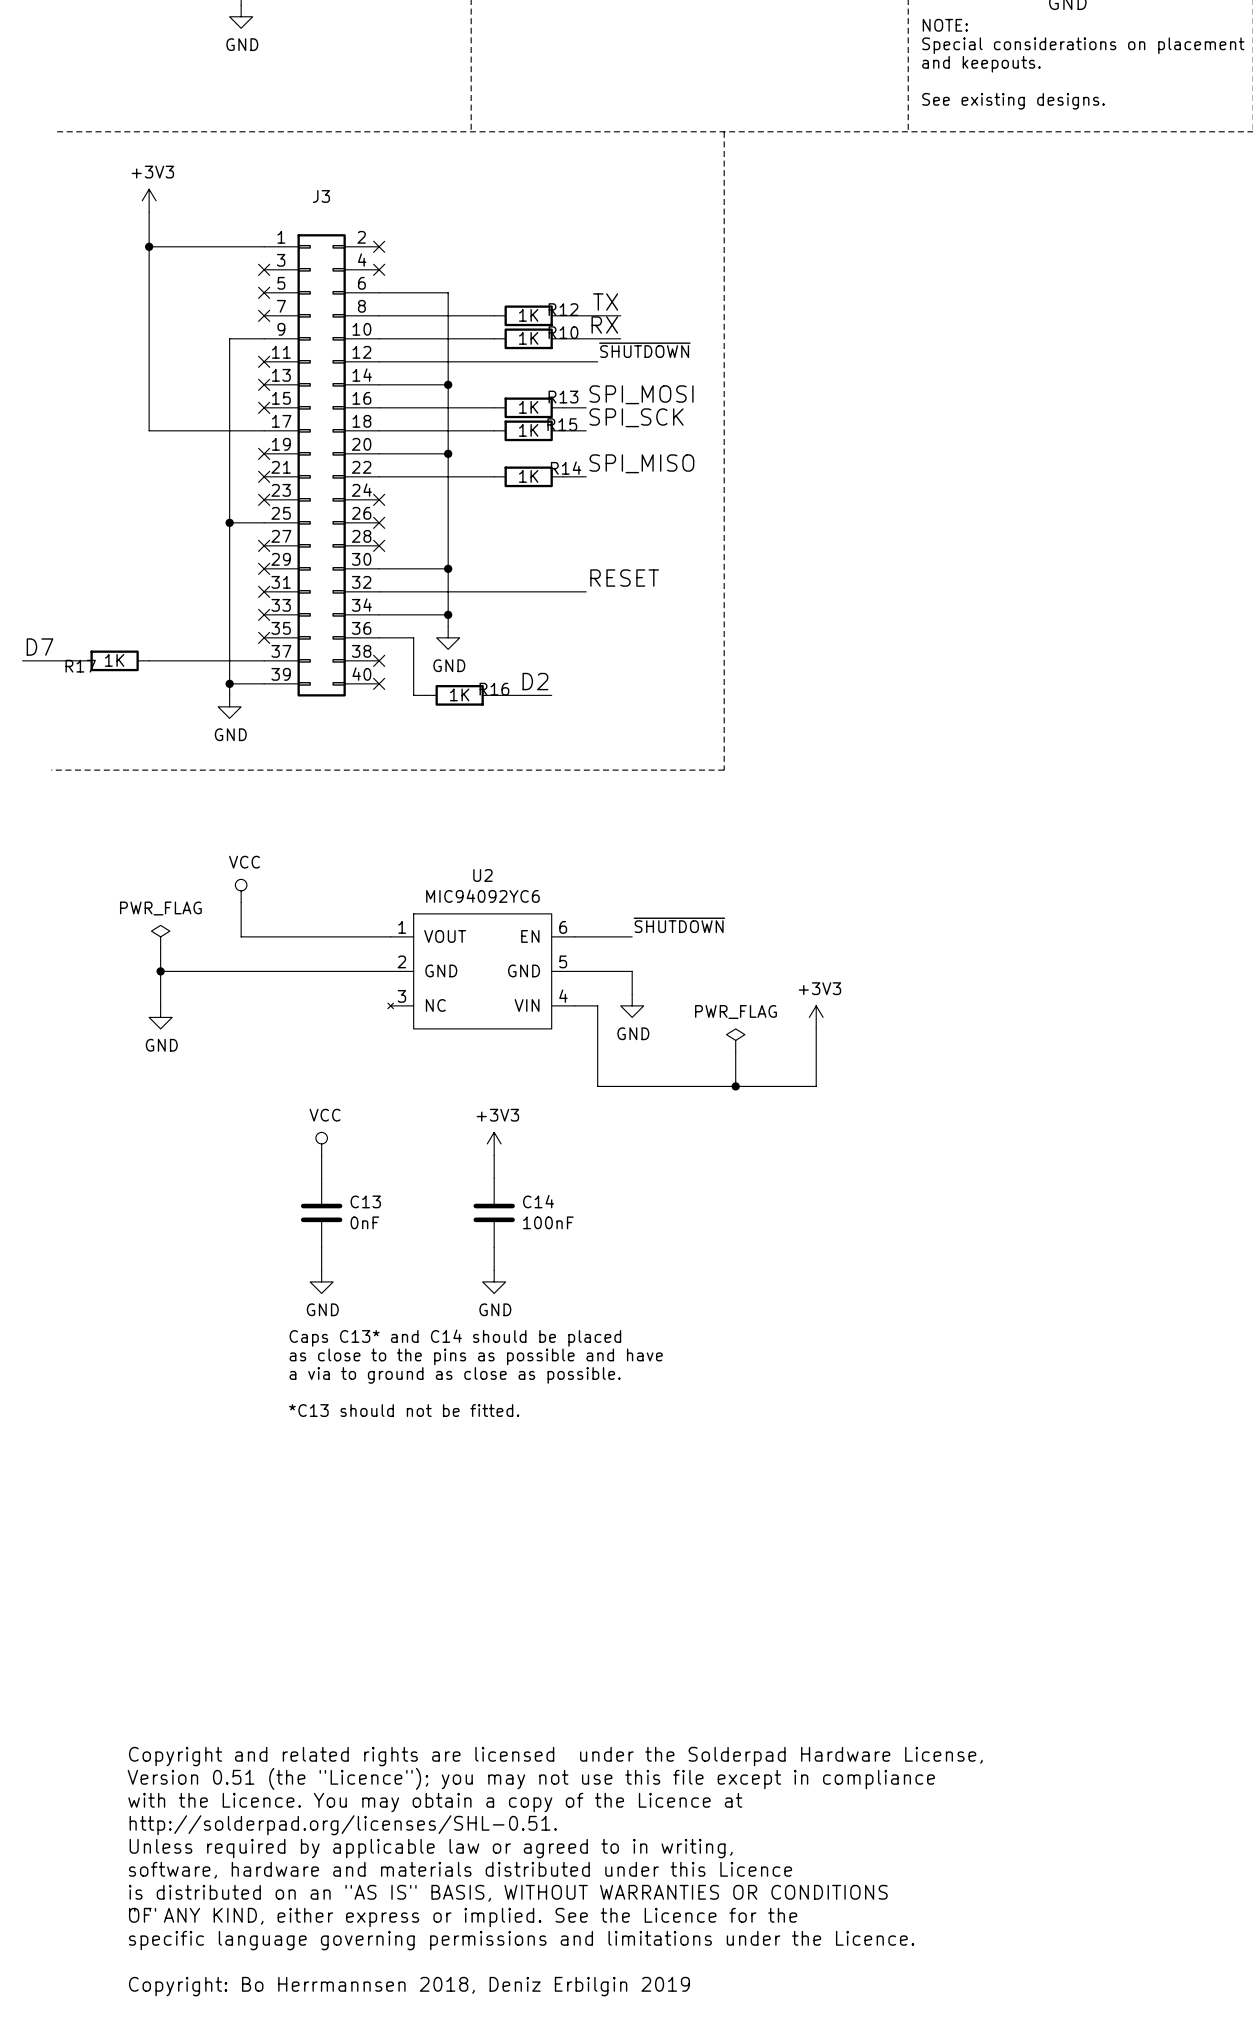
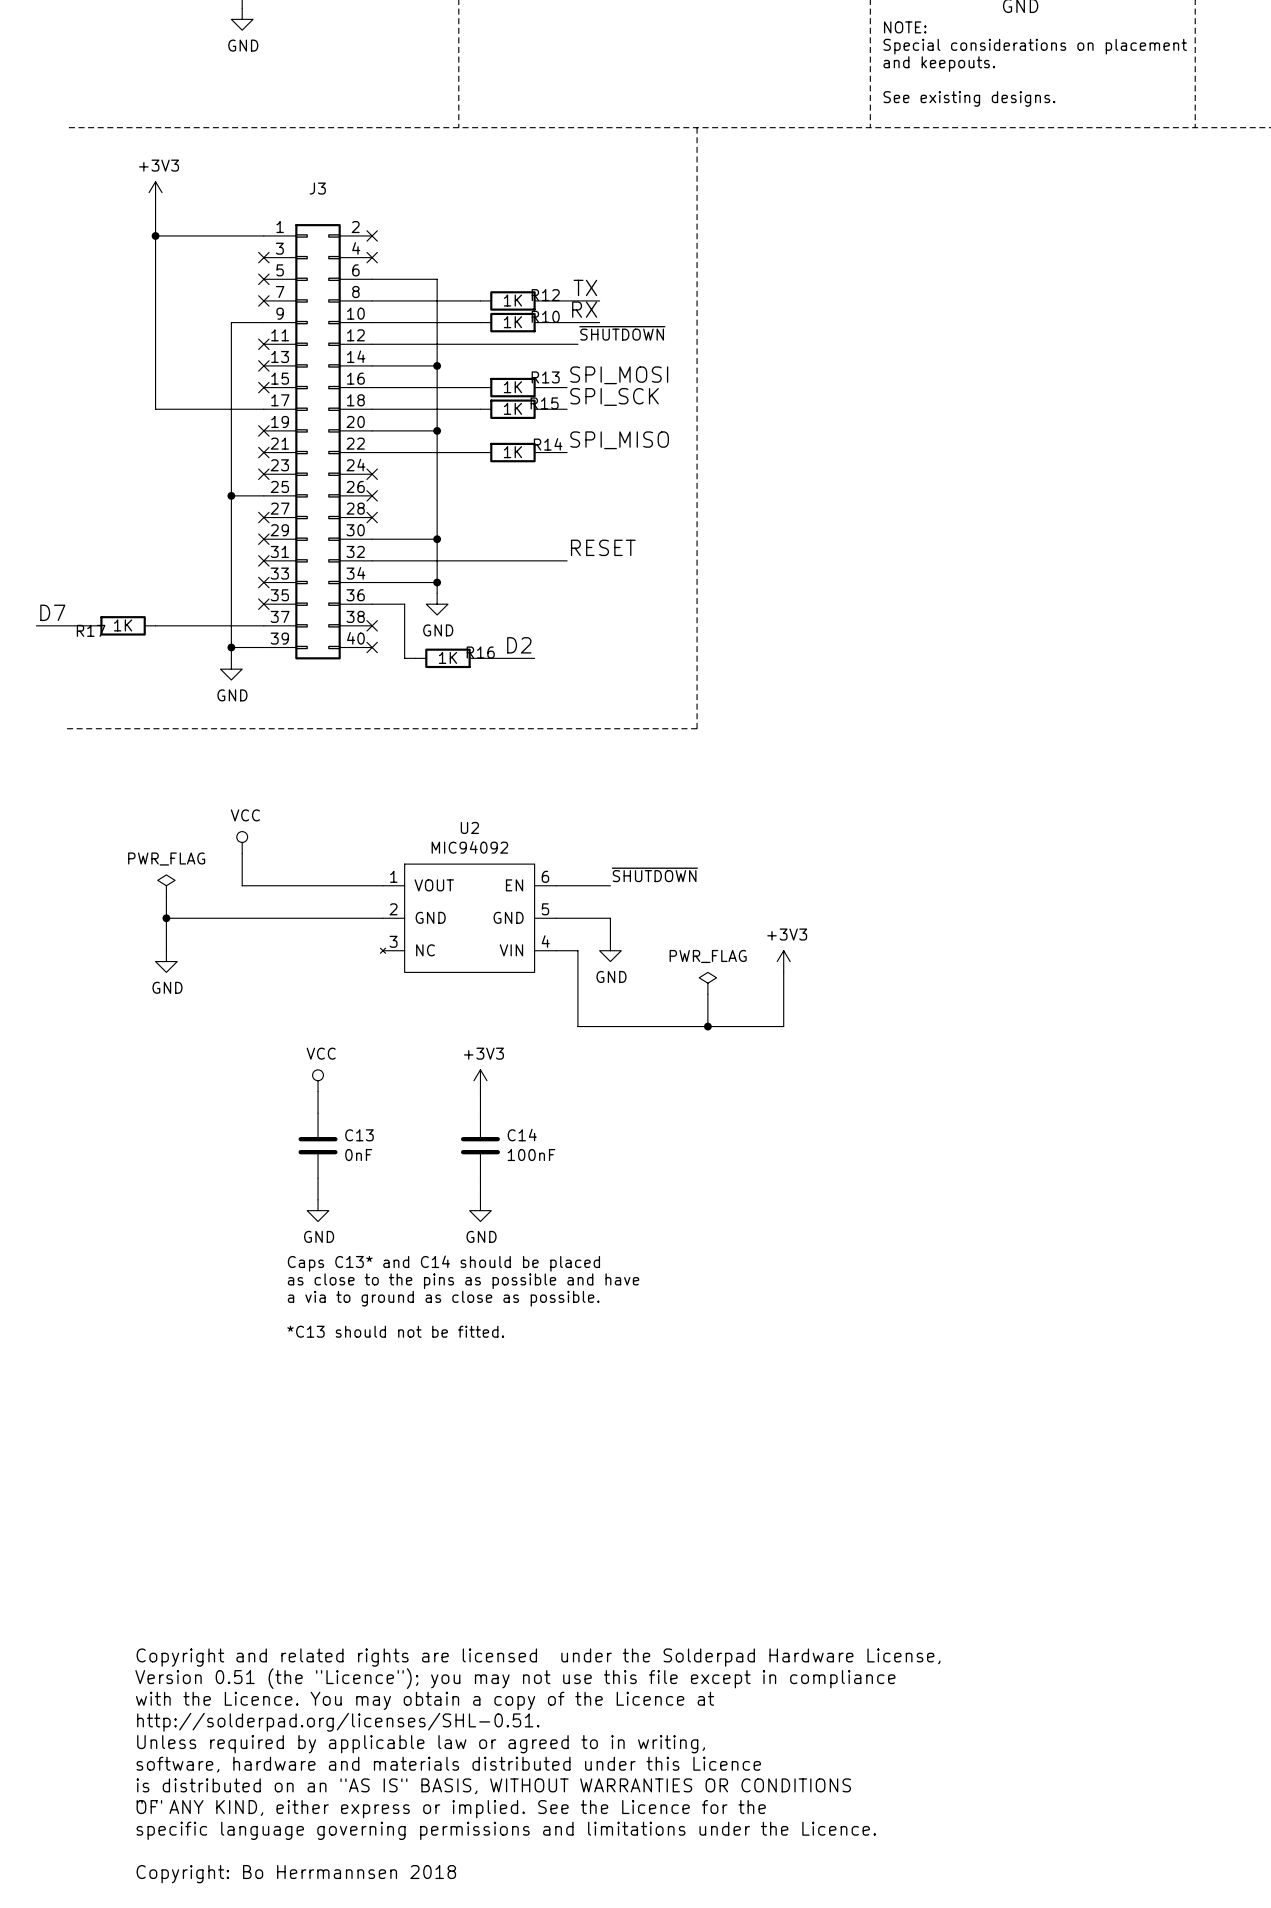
U2 value: MIC94092YC6 (482, 896) -> MIC94092 (469, 847)
text: Copyright: Bo Herrmannsen 2018, Deniz Erbilgin 2019 (409, 1986) -> Copyright: Bo Herrmannsen 2018 (296, 1874)

